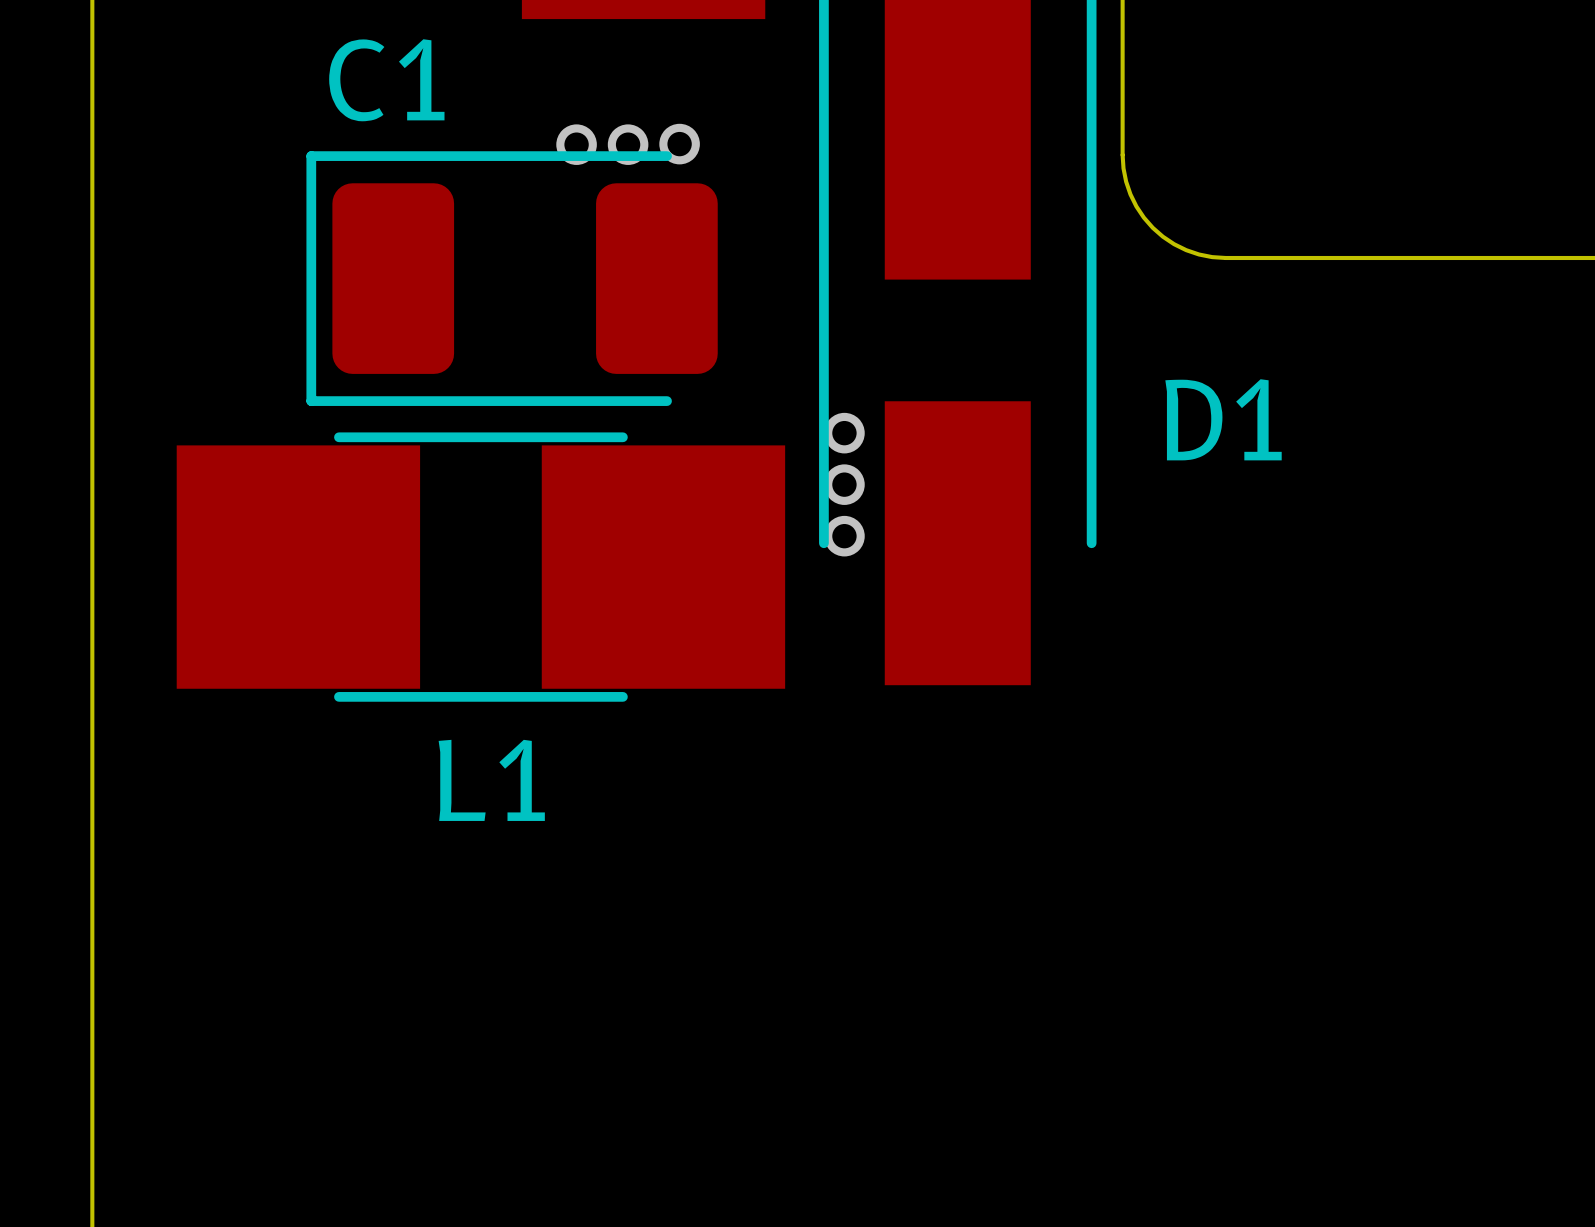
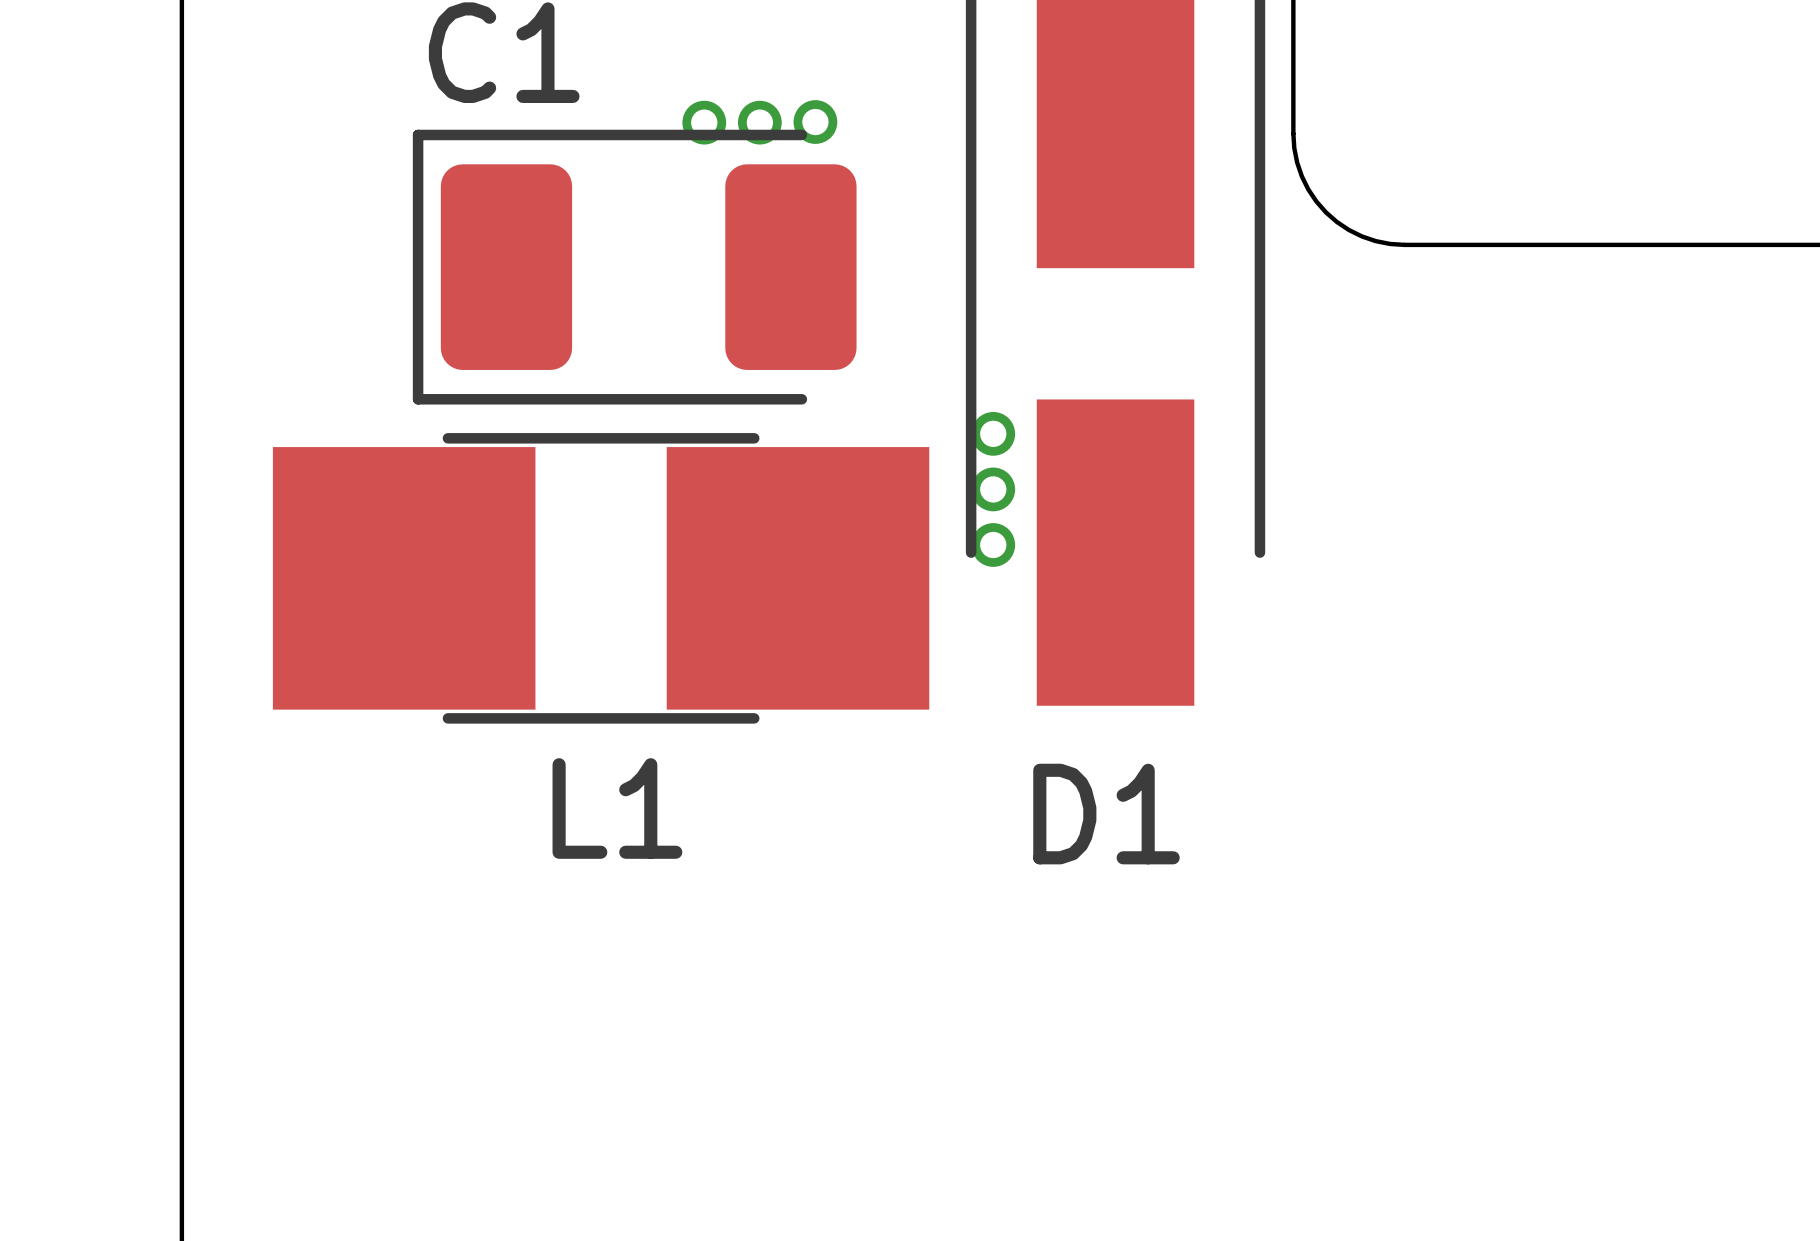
D1 name position: D1 (1223, 419) -> D1 (1106, 814)

